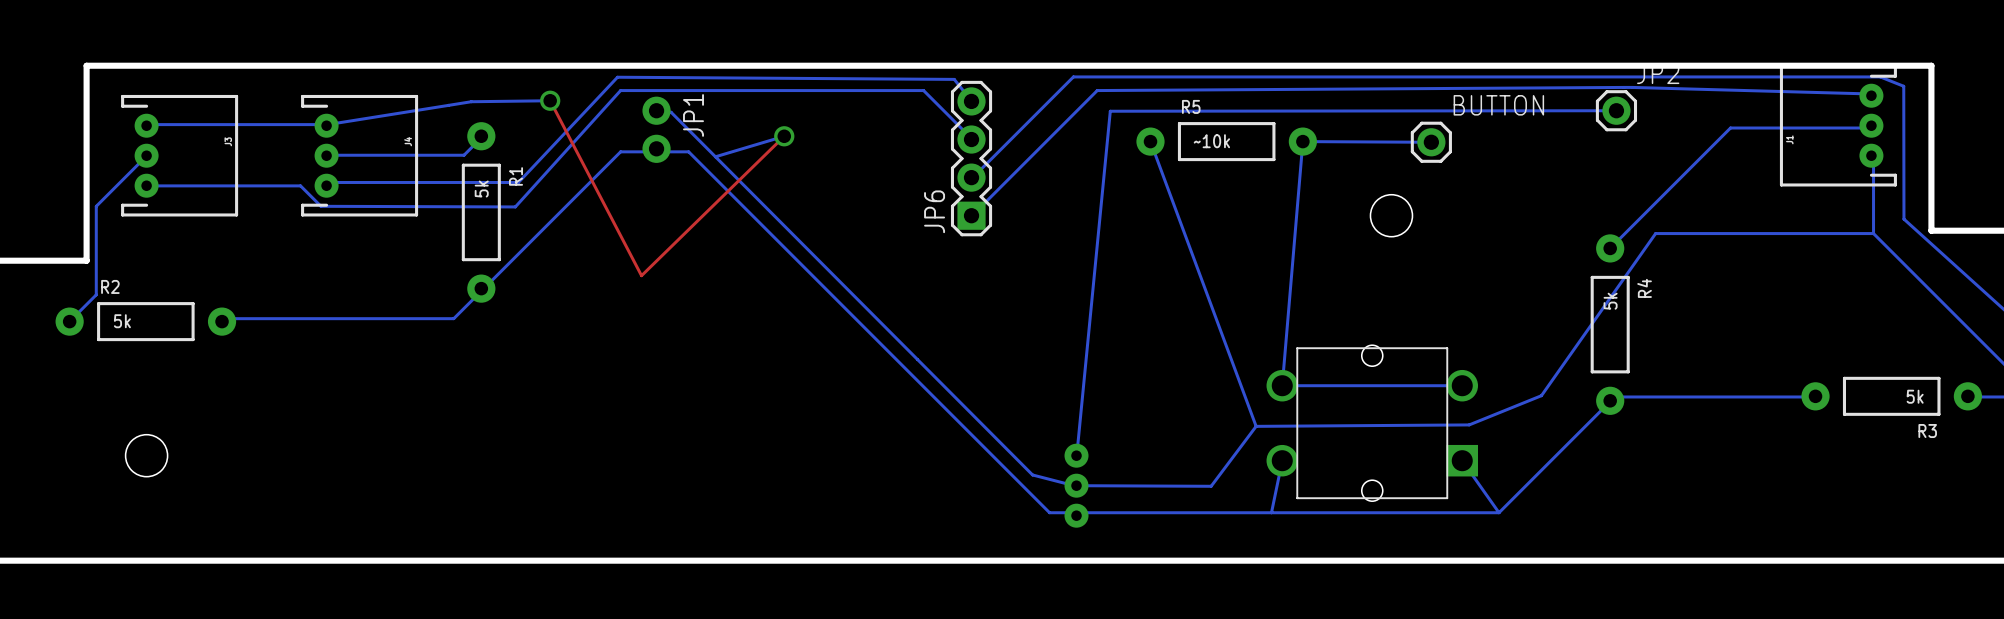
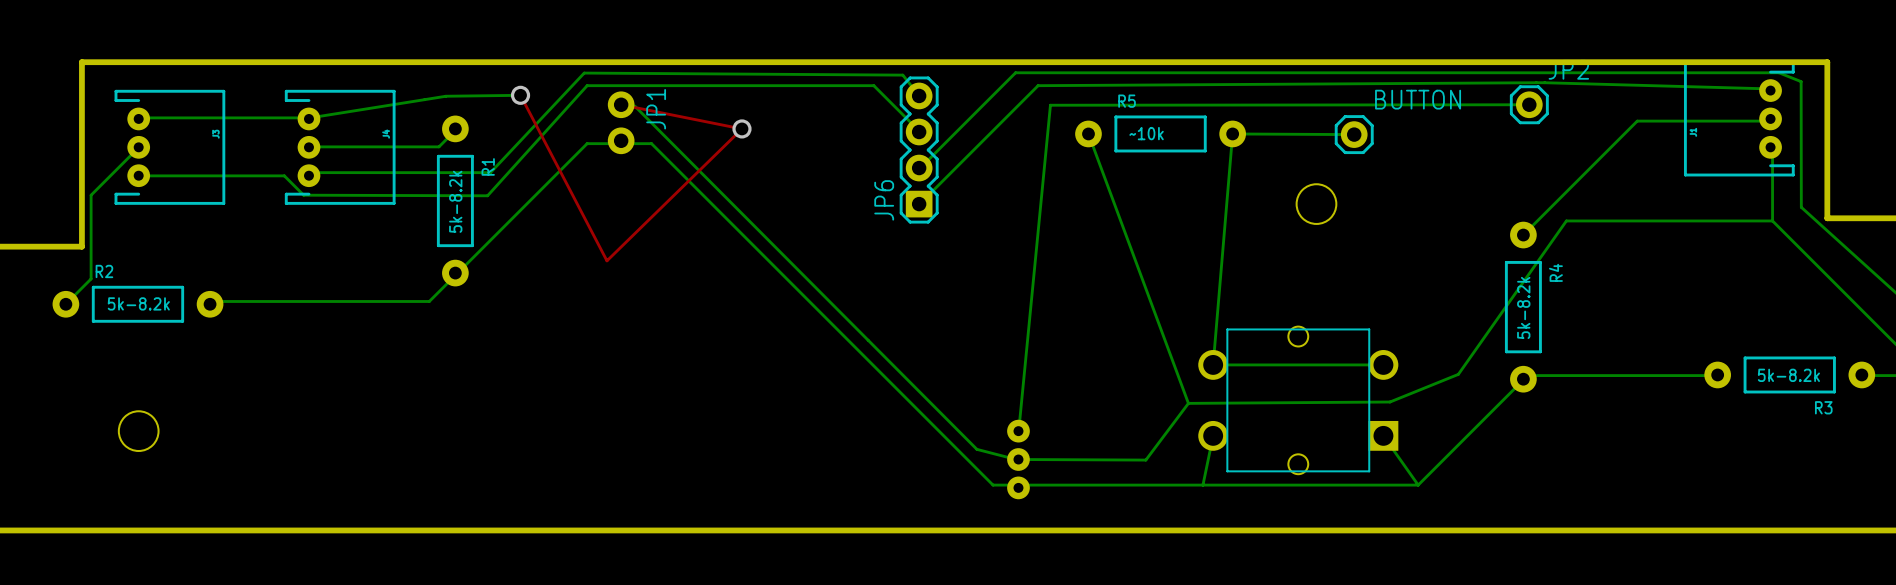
top track: none -> (621, 104) (741, 128)
bottom track: (784, 136) (715, 156) -> none
R1 value: 5k (481, 189) -> 5k-8.2k (455, 201)
R4 value: 5k (1610, 301) -> 5k-8.2k (1523, 307)
R2 value: 5k (122, 321) -> 5k-8.2k (138, 303)
R3 value: 5k (1915, 396) -> 5k-8.2k (1788, 375)

